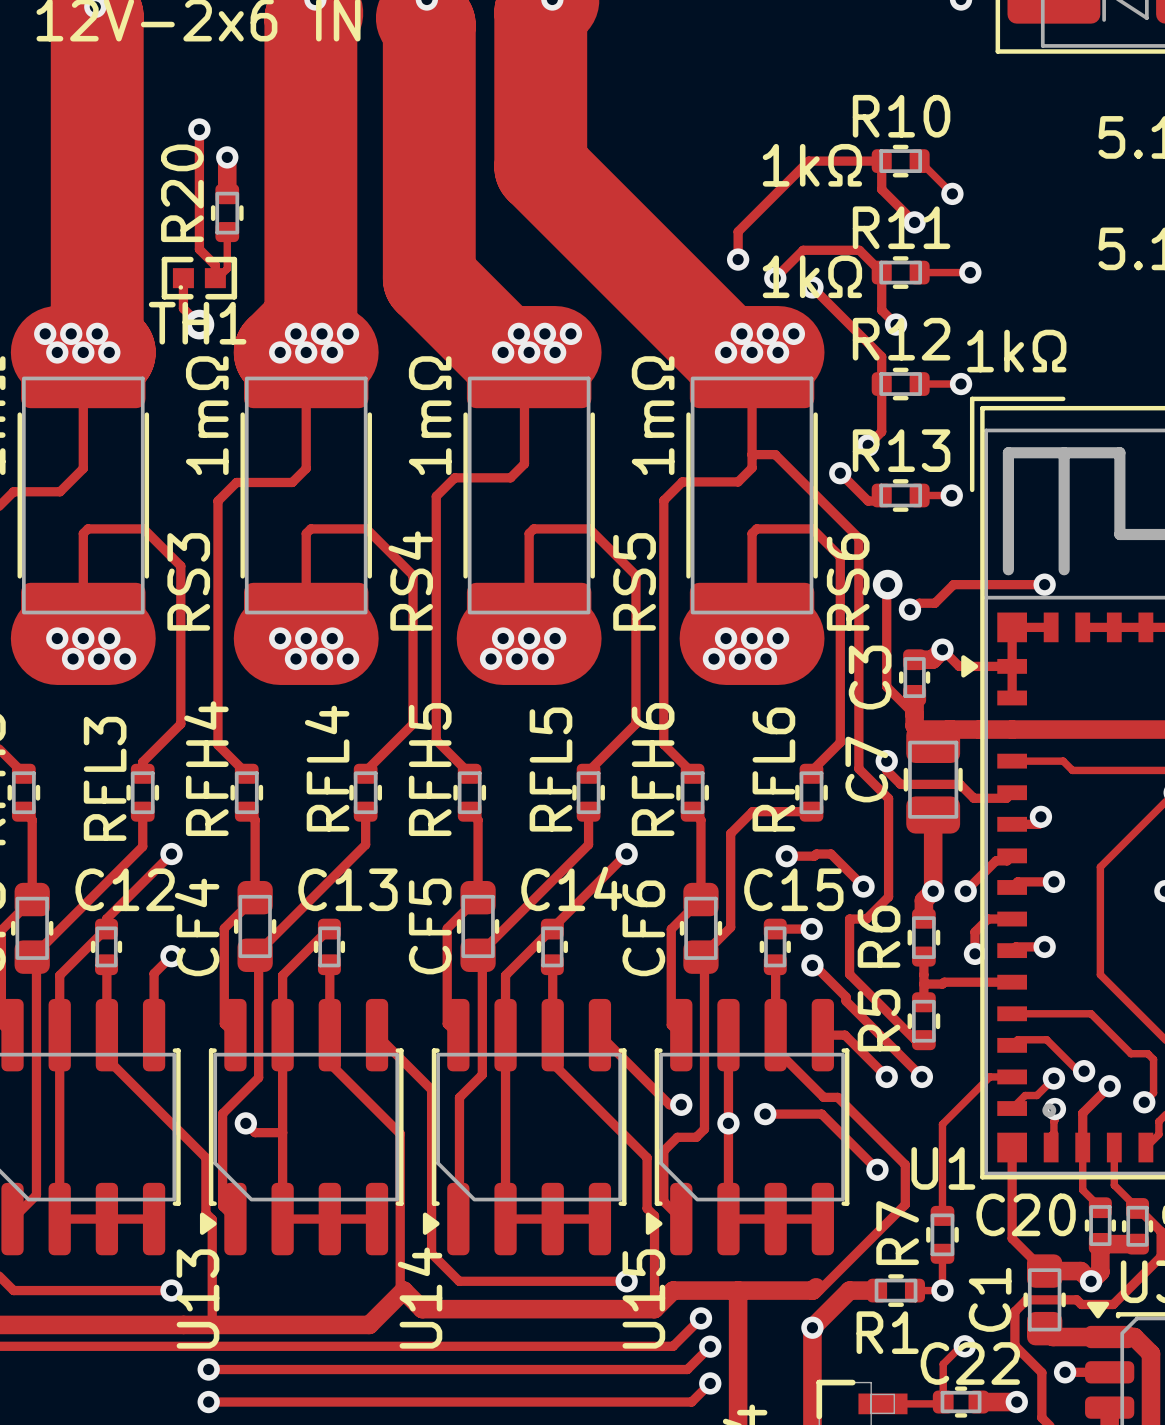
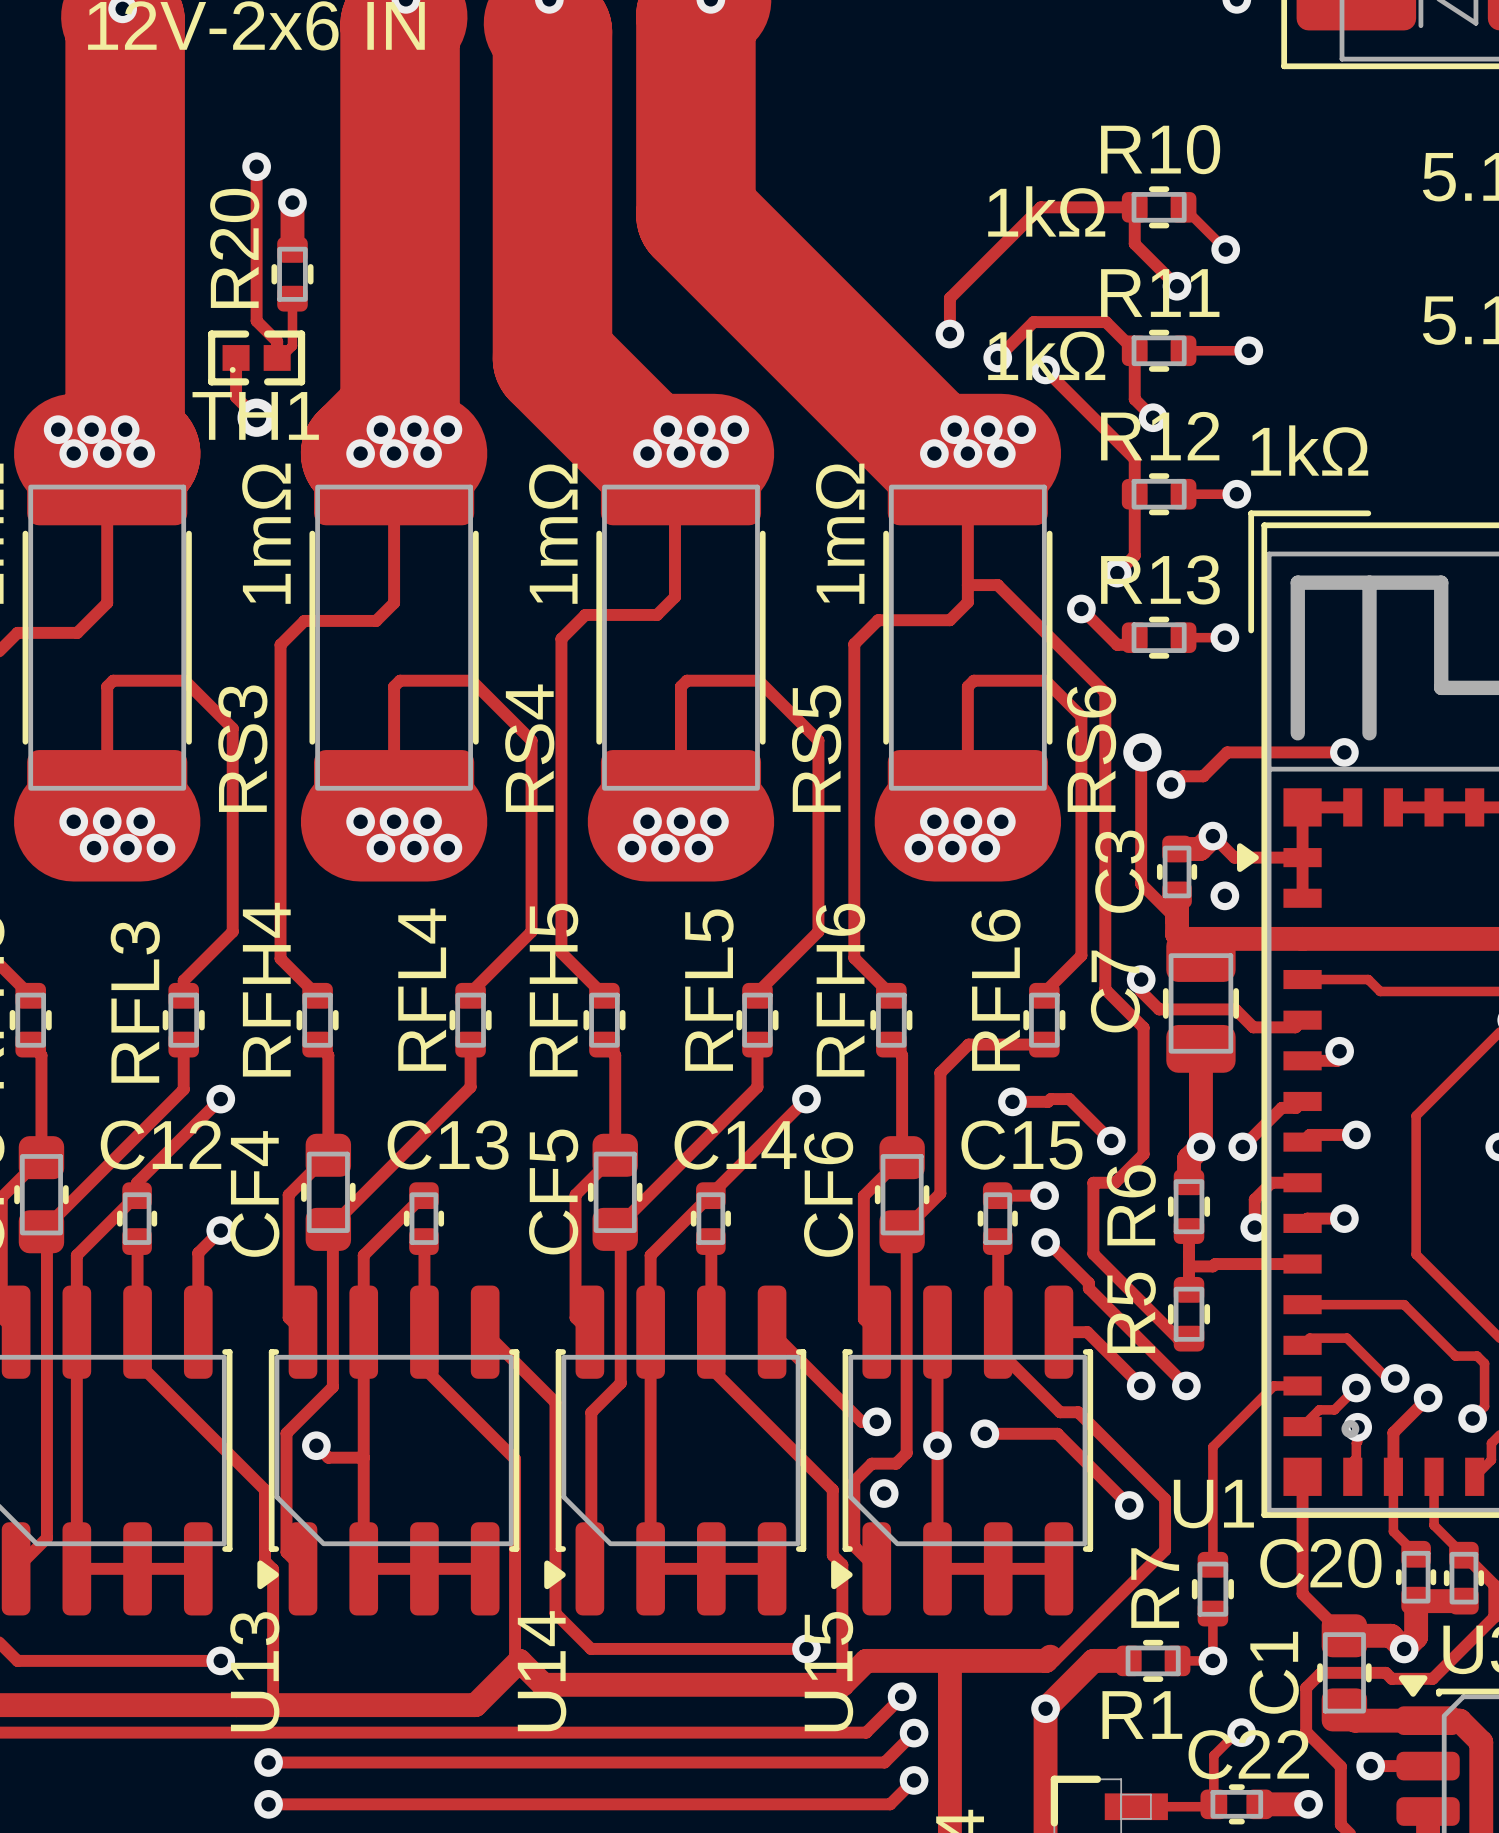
via: none -> (1224, 895)
via: none -> (884, 1493)

